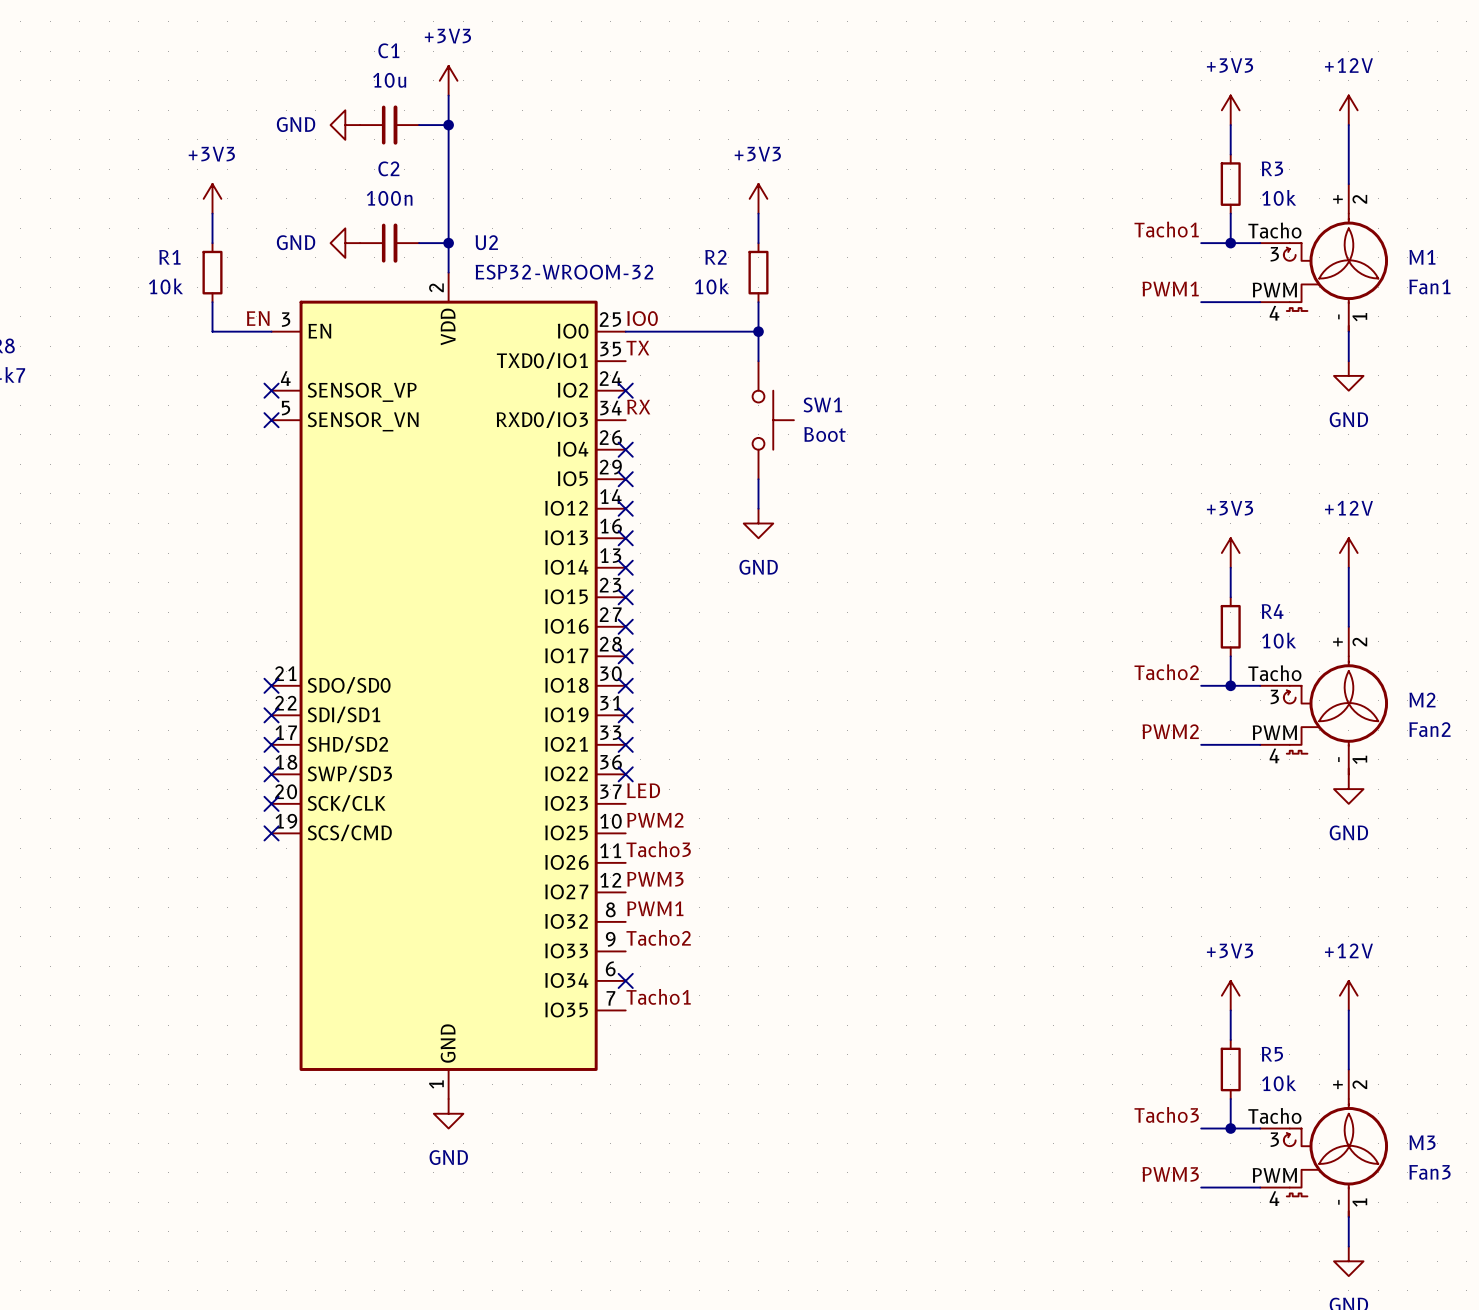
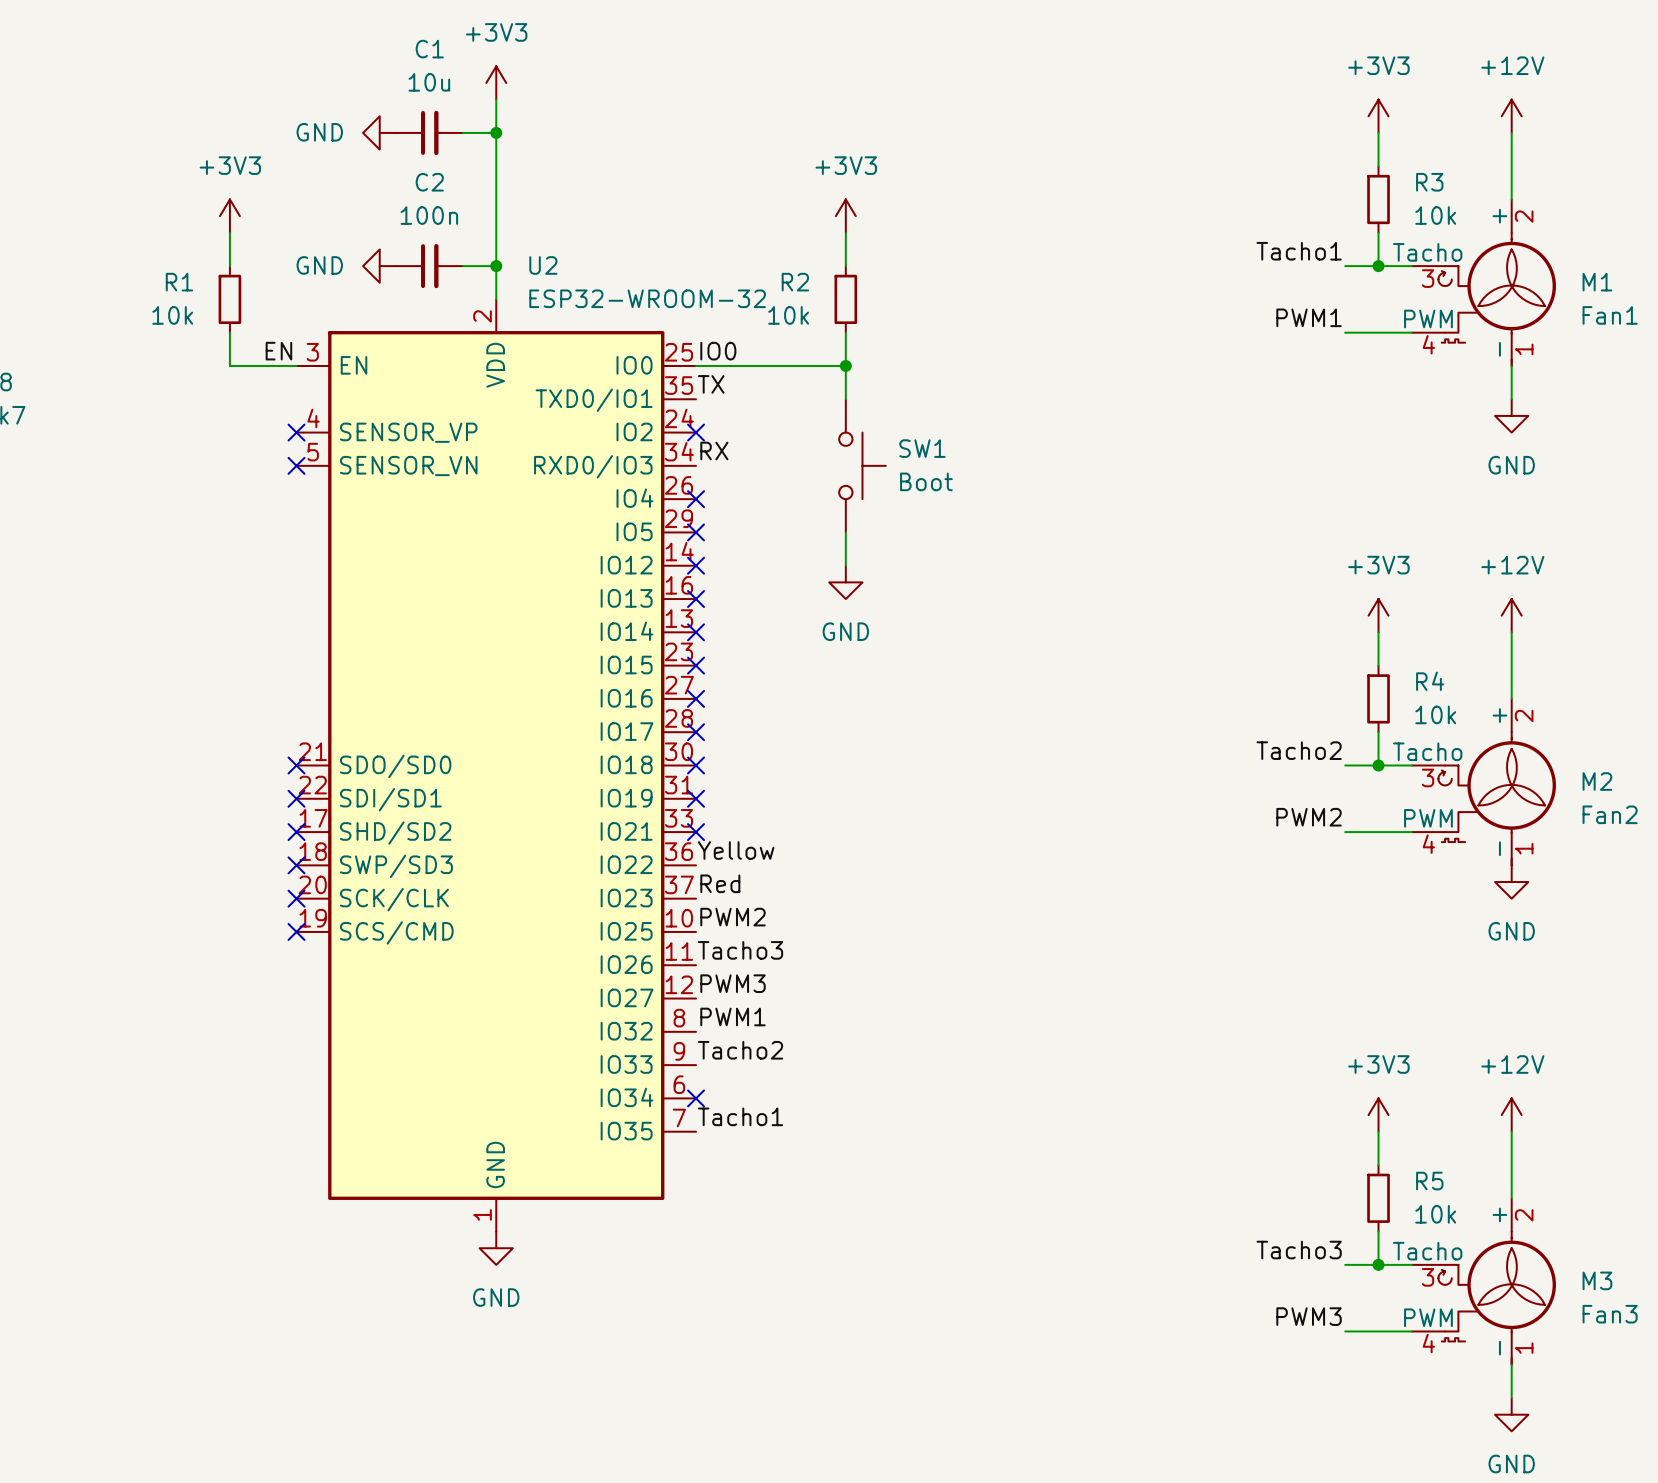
label: none -> Yellow (736, 850)
no-connect mark: (625, 774) -> none
label: LED (643, 790) -> Red (720, 883)

